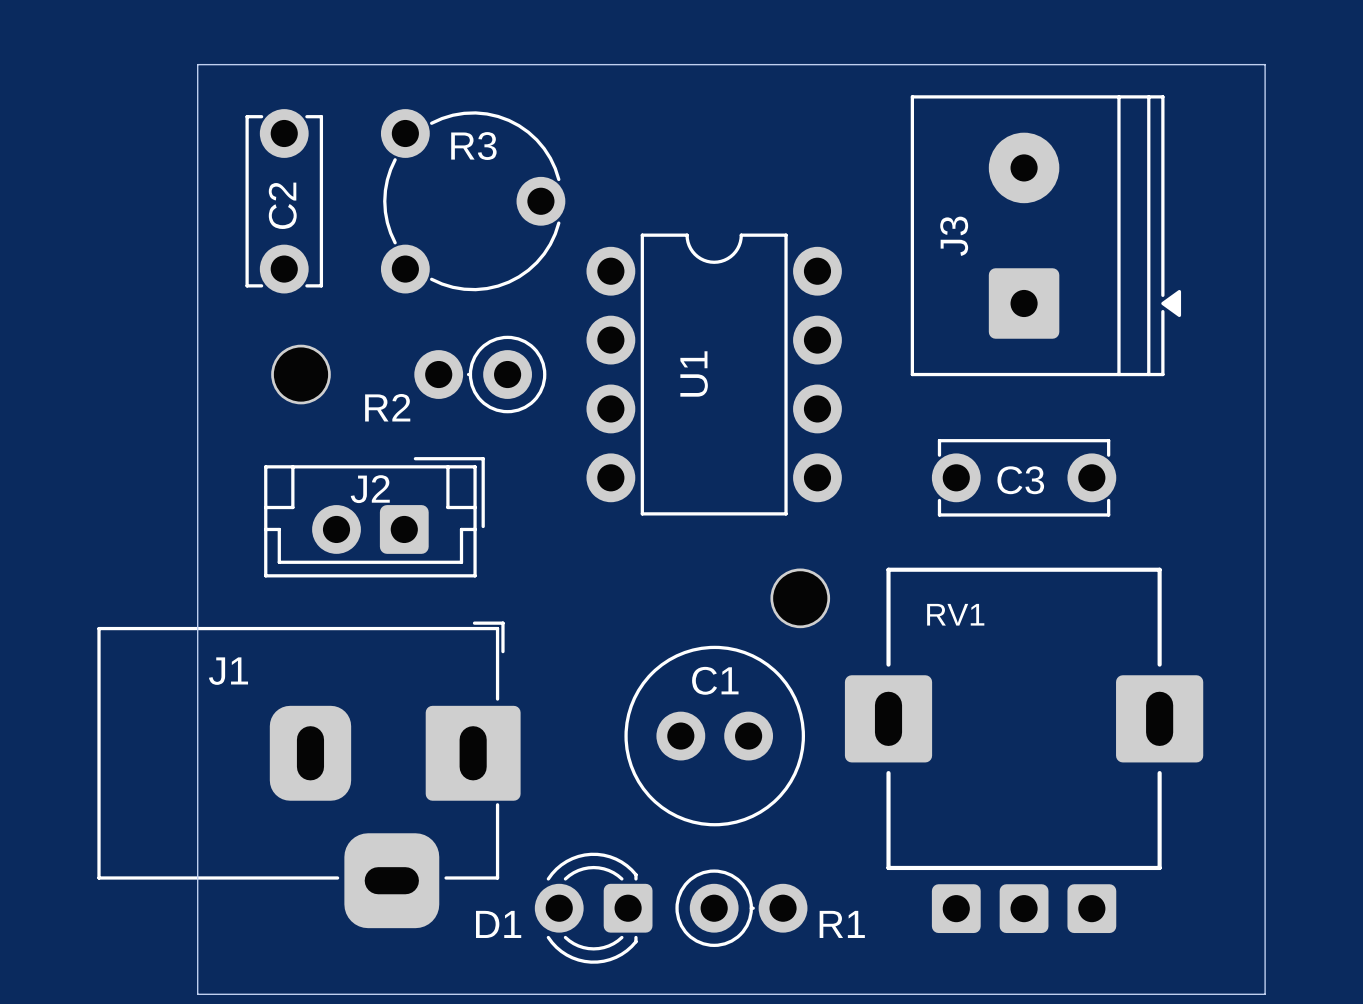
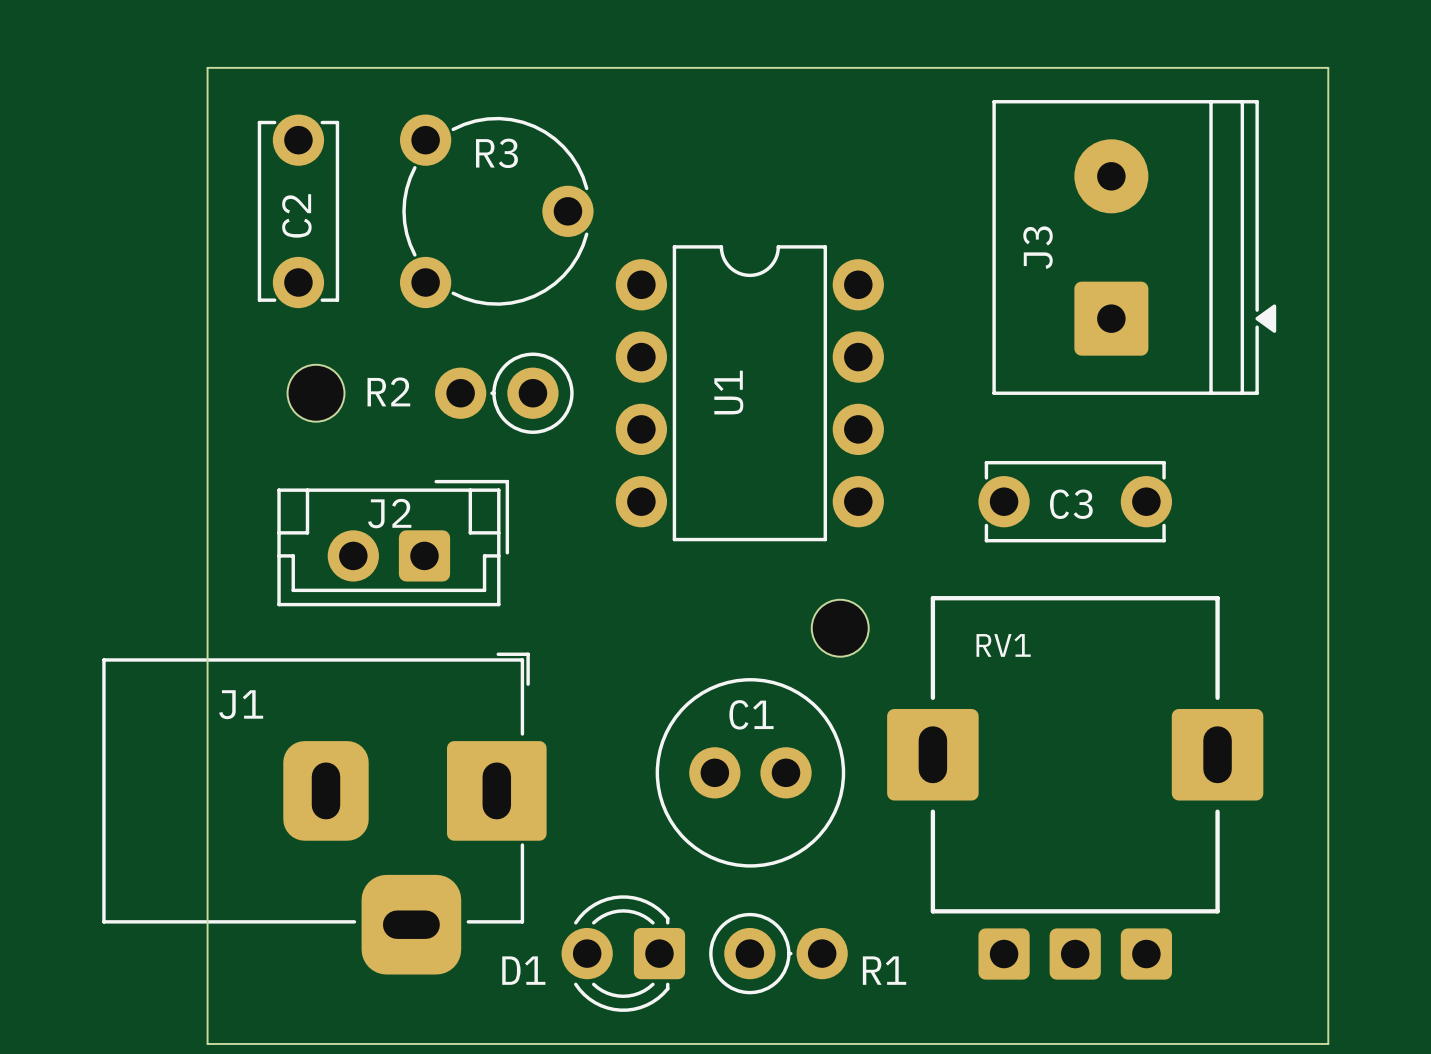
J3 position: (1045, 235) -> (1134, 247)
part footprint: [271, 344, 331, 405] -> [287, 364, 345, 422]
R2 name position: R2 (387, 407) -> R2 (388, 391)
part footprint: [770, 568, 831, 629] -> [811, 599, 869, 657]

